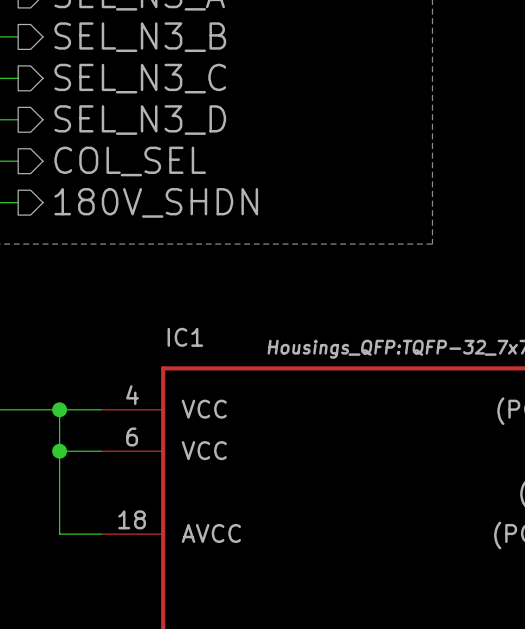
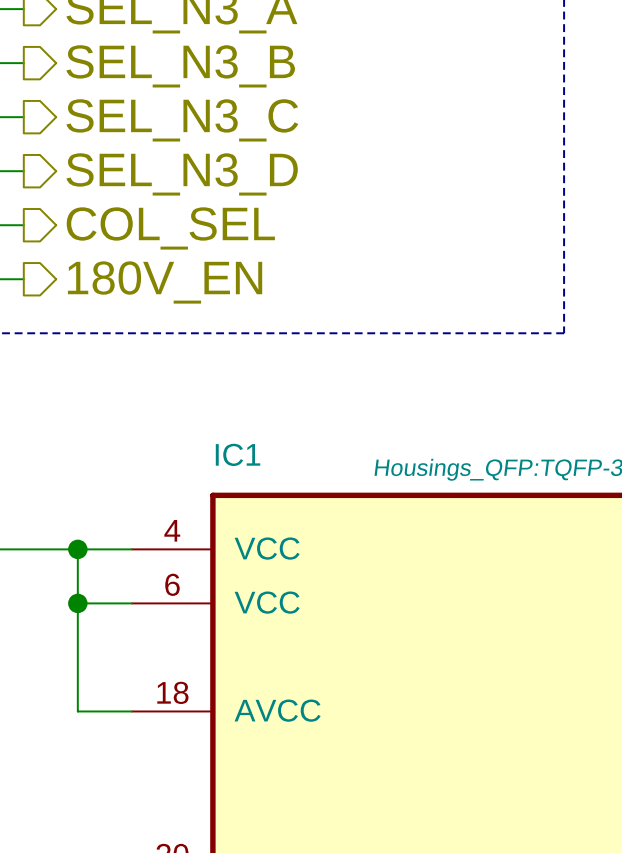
hierarchical label: 180V_SHDN (156, 202) -> 180V_EN (165, 282)

